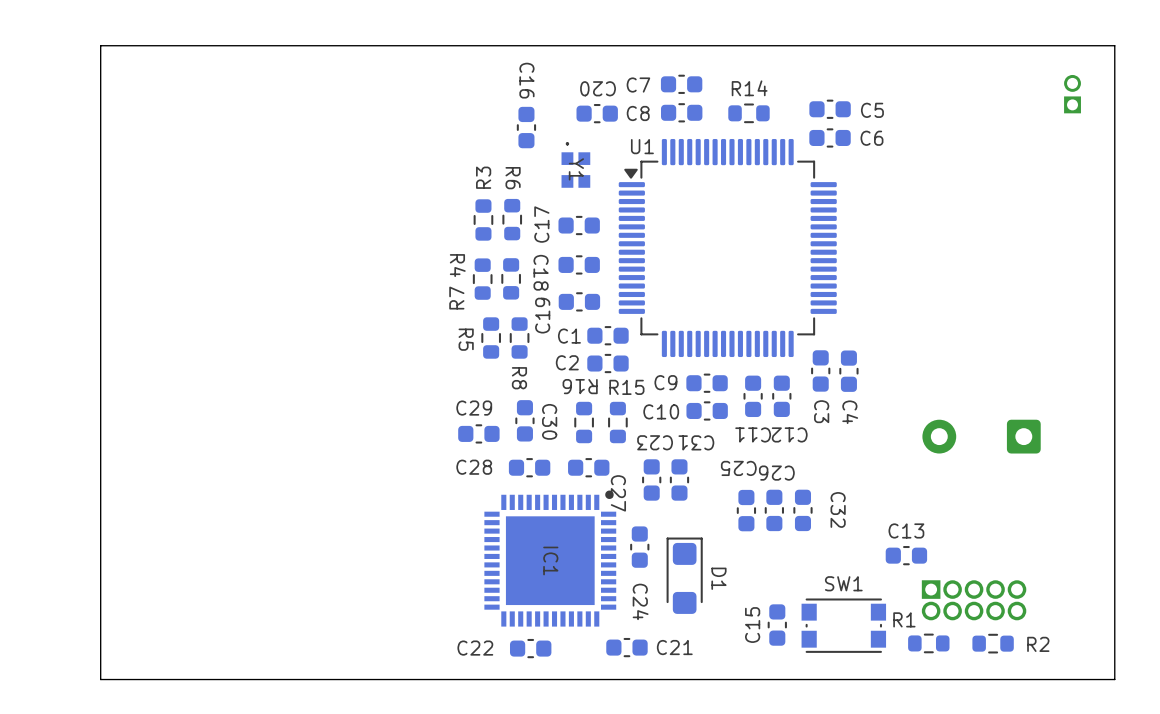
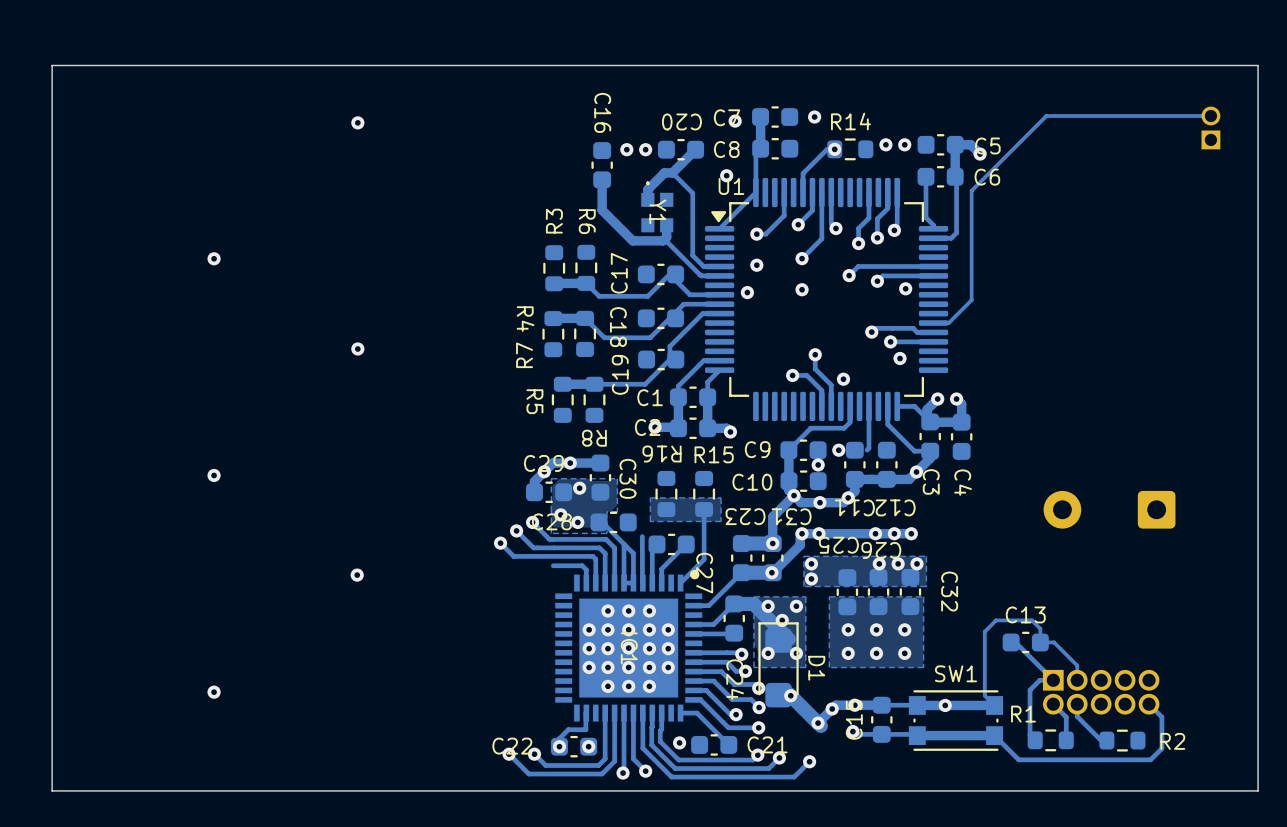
board edge: (1114, 45) (100, 45) (100, 679) (1114, 679) -> (1258, 73) (1258, 65) (52, 65) (52, 790) (1258, 790) (1258, 780)
track: none -> (1210, 116) (1046, 116) (971, 190) (971, 300) (948, 323) (933, 323)
track: none -> (760, 117) (760, 148) (755, 153) (755, 192) (719, 228)
via: none -> (814, 117)
via: none -> (735, 121)
via: none -> (357, 122)
via: none -> (885, 144)
via: none -> (904, 144)
via: none -> (626, 149)
via: none -> (645, 149)
track: none -> (695, 149) (672, 172)
track: none -> (834, 149) (827, 149) (803, 173) (803, 192)
via: none -> (834, 149)
track: none -> (980, 154) (970, 144) (955, 144) (956, 232) (951, 238) (933, 238)
via: none -> (980, 154)
track: none -> (672, 172) (692, 193) (692, 255) (703, 266) (719, 266)
track: none -> (672, 172) (664, 172) (647, 189) (647, 199)
via: none -> (726, 175)
track: none -> (925, 176) (925, 217) (933, 225) (933, 228)
track: none -> (602, 179) (602, 210) (632, 240) (662, 240) (666, 237) (666, 225) (666, 241) (700, 275) (719, 275)
track: none -> (784, 192) (784, 215) (765, 234) (756, 234)
track: none -> (812, 192) (812, 210) (798, 224)
track: none -> (821, 192) (821, 238) (802, 258)
track: none -> (831, 192) (831, 223) (835, 228)
track: none -> (868, 192) (868, 218) (858, 228) (858, 243)
track: none -> (887, 192) (887, 208) (877, 218) (877, 237)
track: none -> (897, 192) (897, 227) (894, 230)
via: none -> (798, 224)
via: none -> (835, 228)
via: none -> (894, 230)
via: none -> (756, 234)
via: none -> (877, 237)
via: none -> (858, 243)
via: none -> (214, 258)
via: none -> (802, 258)
via: none -> (756, 265)
track: none -> (933, 266) (858, 266) (849, 275)
via: none -> (849, 275)
track: none -> (933, 275) (882, 275) (877, 281)
via: none -> (877, 281)
track: none -> (554, 283) (586, 283) (599, 296) (647, 296) (669, 274) (690, 294) (719, 294)
via: none -> (905, 288)
via: none -> (802, 289)
via: none -> (747, 292)
track: none -> (719, 304) (683, 304) (650, 337) (604, 337) (585, 318) (553, 318)
track: none -> (719, 313) (702, 313) (669, 346) (669, 359) (645, 384) (562, 384)
track: none -> (871, 332) (875, 328) (913, 328) (917, 332) (933, 332)
via: none -> (871, 332)
via: none -> (890, 341)
track: none -> (933, 341) (889, 341)
via: none -> (357, 348)
track: none -> (815, 354) (815, 368) (831, 385) (831, 406)
via: none -> (815, 354)
via: none -> (900, 358)
track: none -> (719, 360) (703, 360) (678, 386) (678, 428) (655, 427)
track: none -> (719, 370) (707, 382) (707, 428) (726, 428) (730, 431)
track: none -> (792, 375) (806, 375) (821, 390) (821, 406)
via: none -> (792, 375)
via: none -> (843, 379)
via: none -> (937, 399)
track: none -> (956, 399) (961, 404) (961, 422) (930, 422) (927, 418) (927, 409) (937, 399)
via: none -> (956, 399)
track: none -> (850, 406) (850, 422) (844, 428) (810, 428) (788, 450) (788, 481)
track: none -> (868, 406) (868, 448) (867, 450)
track: none -> (887, 406) (887, 424) (914, 451) (930, 451) (930, 458) (909, 479) (854, 479) (854, 491) (843, 502) (801, 502) (789, 490) (789, 481)
track: none -> (897, 406) (914, 406) (930, 421)
via: none -> (655, 427)
via: none -> (730, 431)
R8 name rotation: 0° (519, 378) -> 90° clockwise (594, 438)
via: none -> (838, 450)
via: none -> (570, 463)
track: none -> (600, 463) (552, 463) (534, 481) (534, 492)
via: none -> (818, 464)
via: none -> (544, 471)
via: none -> (916, 472)
via: none -> (214, 475)
zone outline: none -> (617, 478) (617, 511) (606, 511) (606, 533) (551, 533) (551, 478) (617, 478)
via: none -> (579, 488)
C30 position: (524, 420) -> (600, 477)
track: none -> (794, 495) (772, 516) (772, 543) (741, 543)
via: none -> (794, 495)
zone outline: none -> (721, 497) (721, 521) (650, 521) (650, 497) (721, 497)
via: none -> (848, 497)
via: none -> (819, 502)
C29 position: (478, 433) -> (549, 492)
track: none -> (704, 509) (704, 559) (680, 583)
via: none -> (560, 514)
track: none -> (532, 522) (549, 539) (606, 539) (614, 547) (614, 582)
via: none -> (532, 522)
via: none -> (577, 522)
track: none -> (599, 522) (602, 522) (633, 553) (633, 583) (624, 583) (624, 544)
track: none -> (516, 530) (533, 547) (599, 547) (605, 553) (605, 583)
via: none -> (516, 530)
via: none -> (802, 533)
via: none -> (819, 533)
via: none -> (875, 533)
via: none -> (894, 533)
track: none -> (911, 533) (800, 533) (800, 545) (772, 572) (741, 572) (708, 605) (693, 605)
via: none -> (911, 533)
track: none -> (642, 536) (642, 582)
track: none -> (500, 543) (513, 556) (592, 556) (595, 559) (595, 583)
via: none -> (500, 543)
via: none -> (772, 543)
C28 position: (529, 467) -> (613, 522)
track: none -> (657, 544) (652, 549) (652, 583)
track: none -> (686, 544) (661, 568) (661, 583)
zone outline: none -> (926, 556) (926, 586) (803, 586) (803, 556) (926, 556)
via: none -> (811, 563)
via: none -> (879, 563)
via: none -> (898, 563)
via: none -> (916, 563)
track: none -> (553, 565) (582, 565) (586, 569) (586, 583)
via: none -> (771, 572)
via: none -> (357, 575)
via: none -> (811, 578)
zone outline: none -> (805, 596) (754, 596) (754, 667) (805, 667) (805, 596)
zone outline: none -> (923, 596) (923, 667) (829, 667) (829, 596) (923, 596)
via: none -> (768, 606)
via: none -> (796, 606)
via: none -> (607, 610)
via: none -> (628, 610)
via: none -> (649, 610)
via: none -> (782, 620)
track: none -> (693, 624) (713, 624) (734, 603) (753, 603) (788, 639)
via: none -> (589, 629)
via: none -> (607, 629)
via: none -> (628, 629)
via: none -> (649, 629)
via: none -> (668, 629)
via: none -> (848, 629)
via: none -> (876, 629)
via: none -> (904, 629)
C24 position: (639, 547) -> (734, 618)
track: none -> (734, 633) (693, 633)
track: none -> (1011, 642) (1015, 642) (1053, 680) (1039, 680) (1030, 690) (1030, 735) (1035, 740)
via: none -> (628, 648)
via: none -> (589, 648)
via: none -> (607, 648)
via: none -> (649, 648)
via: none -> (668, 648)
track: none -> (693, 652) (741, 654)
via: none -> (768, 653)
via: none -> (796, 653)
via: none -> (848, 653)
via: none -> (876, 653)
via: none -> (904, 653)
via: none -> (741, 654)
track: none -> (694, 661) (727, 662) (736, 671) (745, 671)
via: none -> (589, 667)
via: none -> (607, 667)
via: none -> (628, 667)
via: none -> (649, 667)
via: none -> (668, 667)
track: none -> (693, 671) (721, 671) (734, 684) (754, 684) (758, 688)
via: none -> (745, 671)
track: none -> (1077, 680) (1077, 665) (1054, 642) (1040, 642) (1040, 628) (1031, 620) (996, 620) (984, 631) (984, 695) (994, 705) (917, 705)
track: none -> (693, 681) (713, 681) (732, 699) (751, 699) (758, 707)
via: none -> (607, 686)
via: none -> (628, 686)
via: none -> (649, 686)
via: none -> (758, 688)
track: none -> (693, 690) (706, 690) (730, 714) (736, 714)
via: none -> (214, 692)
track: none -> (788, 693) (820, 725)
via: none -> (790, 695)
track: none -> (693, 699) (700, 699) (728, 727) (758, 727)
via: none -> (854, 705)
track: none -> (917, 705) (835, 705) (818, 723)
track: none -> (1053, 704) (1066, 717) (1066, 740)
track: none -> (1077, 704) (1077, 716) (1101, 740) (1106, 740)
track: none -> (1149, 704) (1161, 717) (1161, 748) (1150, 759) (1018, 759) (994, 735) (855, 734) (852, 731)
via: none -> (945, 705)
via: none -> (759, 707)
via: none -> (832, 708)
track: none -> (586, 713) (585, 729) (568, 729) (559, 738) (559, 746)
track: none -> (605, 713) (605, 758) (598, 765) (545, 765) (534, 754)
track: none -> (614, 713) (614, 761) (602, 774) (528, 774) (509, 754)
track: none -> (624, 713) (623, 773)
track: none -> (633, 713) (633, 758) (645, 771)
track: none -> (642, 713) (642, 748) (671, 777) (794, 777) (809, 761)
track: none -> (652, 713) (651, 745) (675, 768) (768, 768) (779, 757)
track: none -> (661, 713) (660, 741) (678, 760) (752, 760) (758, 754)
track: none -> (680, 713) (696, 713) (728, 744)
via: none -> (736, 714)
via: none -> (818, 723)
via: none -> (758, 727)
via: none -> (852, 731)
via: none -> (679, 742)
C22 position: (530, 648) -> (574, 746)
via: none -> (559, 746)
via: none -> (588, 746)
via: none -> (509, 754)
via: none -> (534, 754)
via: none -> (757, 755)
via: none -> (779, 757)
via: none -> (809, 761)
via: none -> (645, 771)
via: none -> (623, 773)

